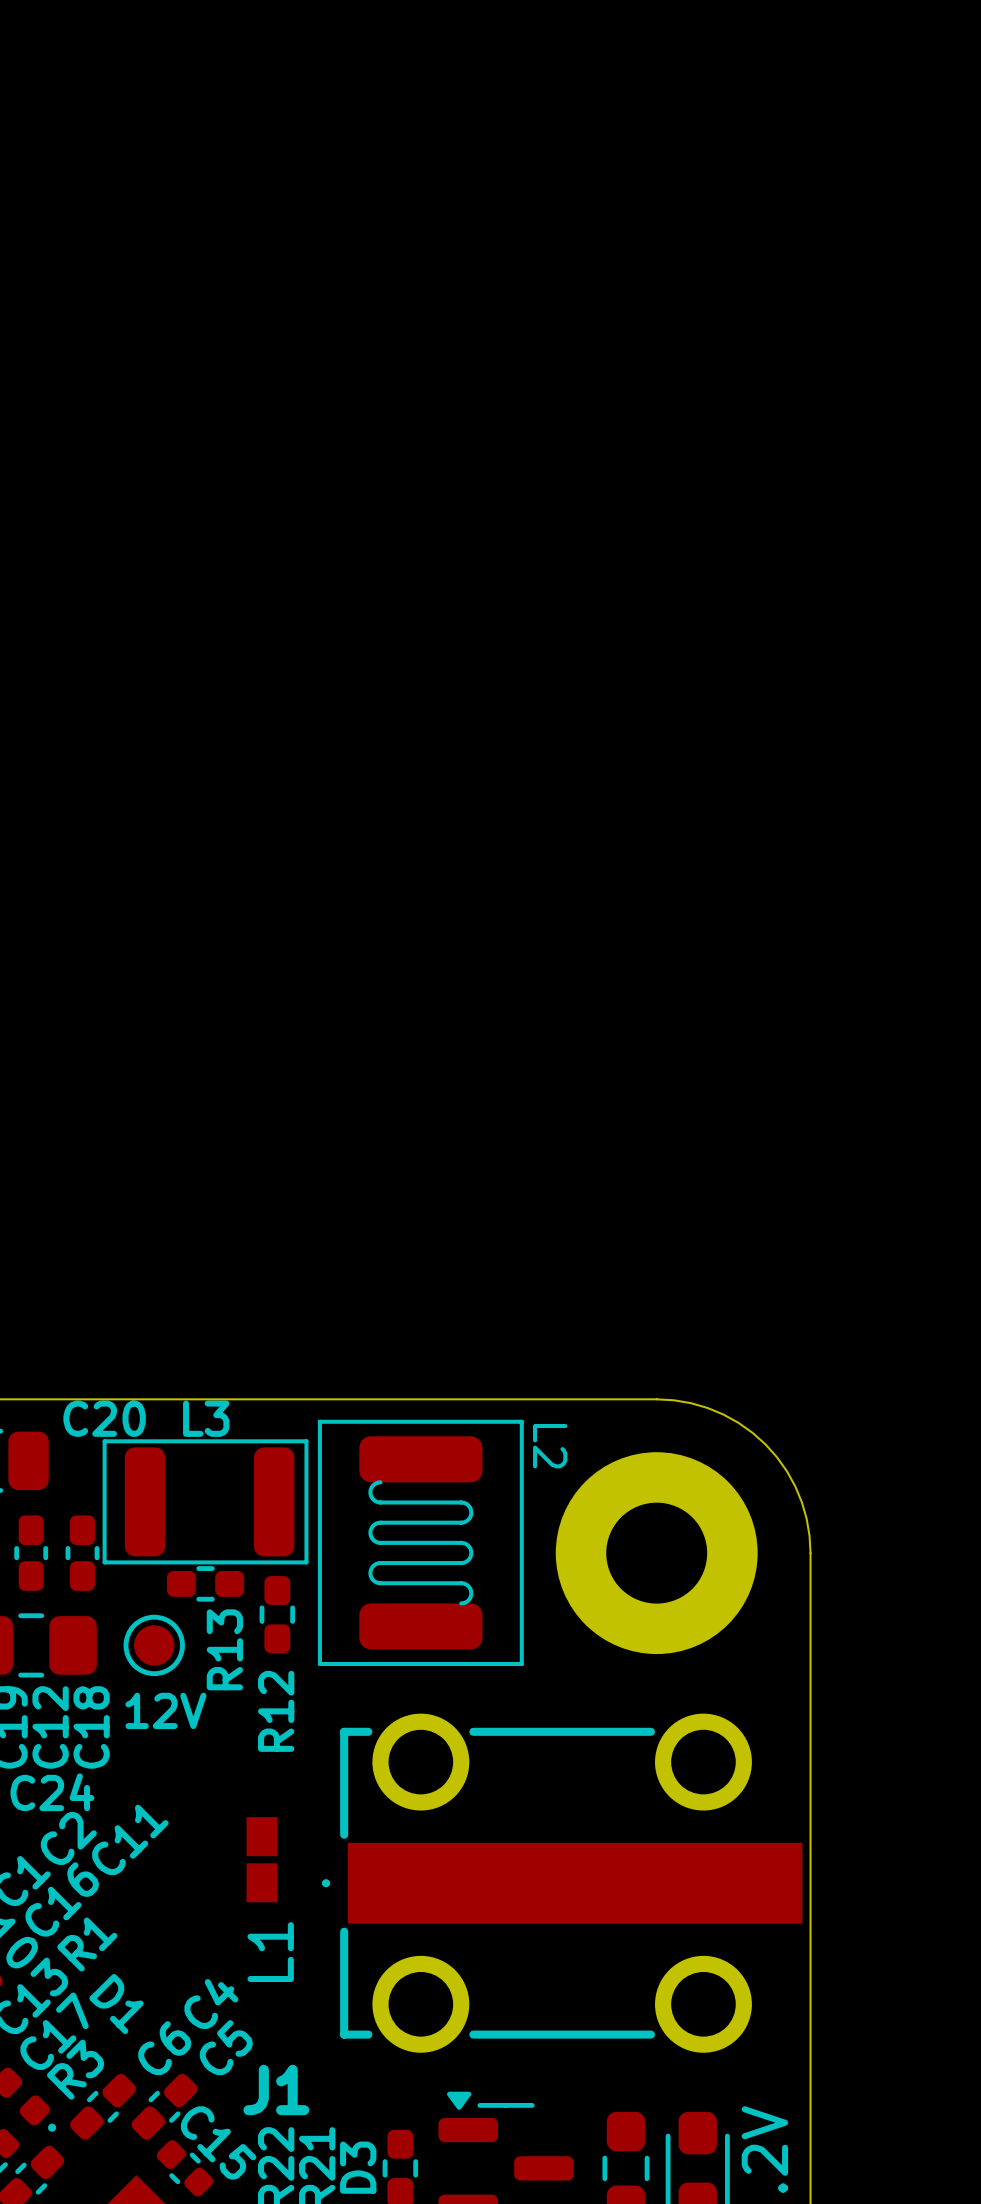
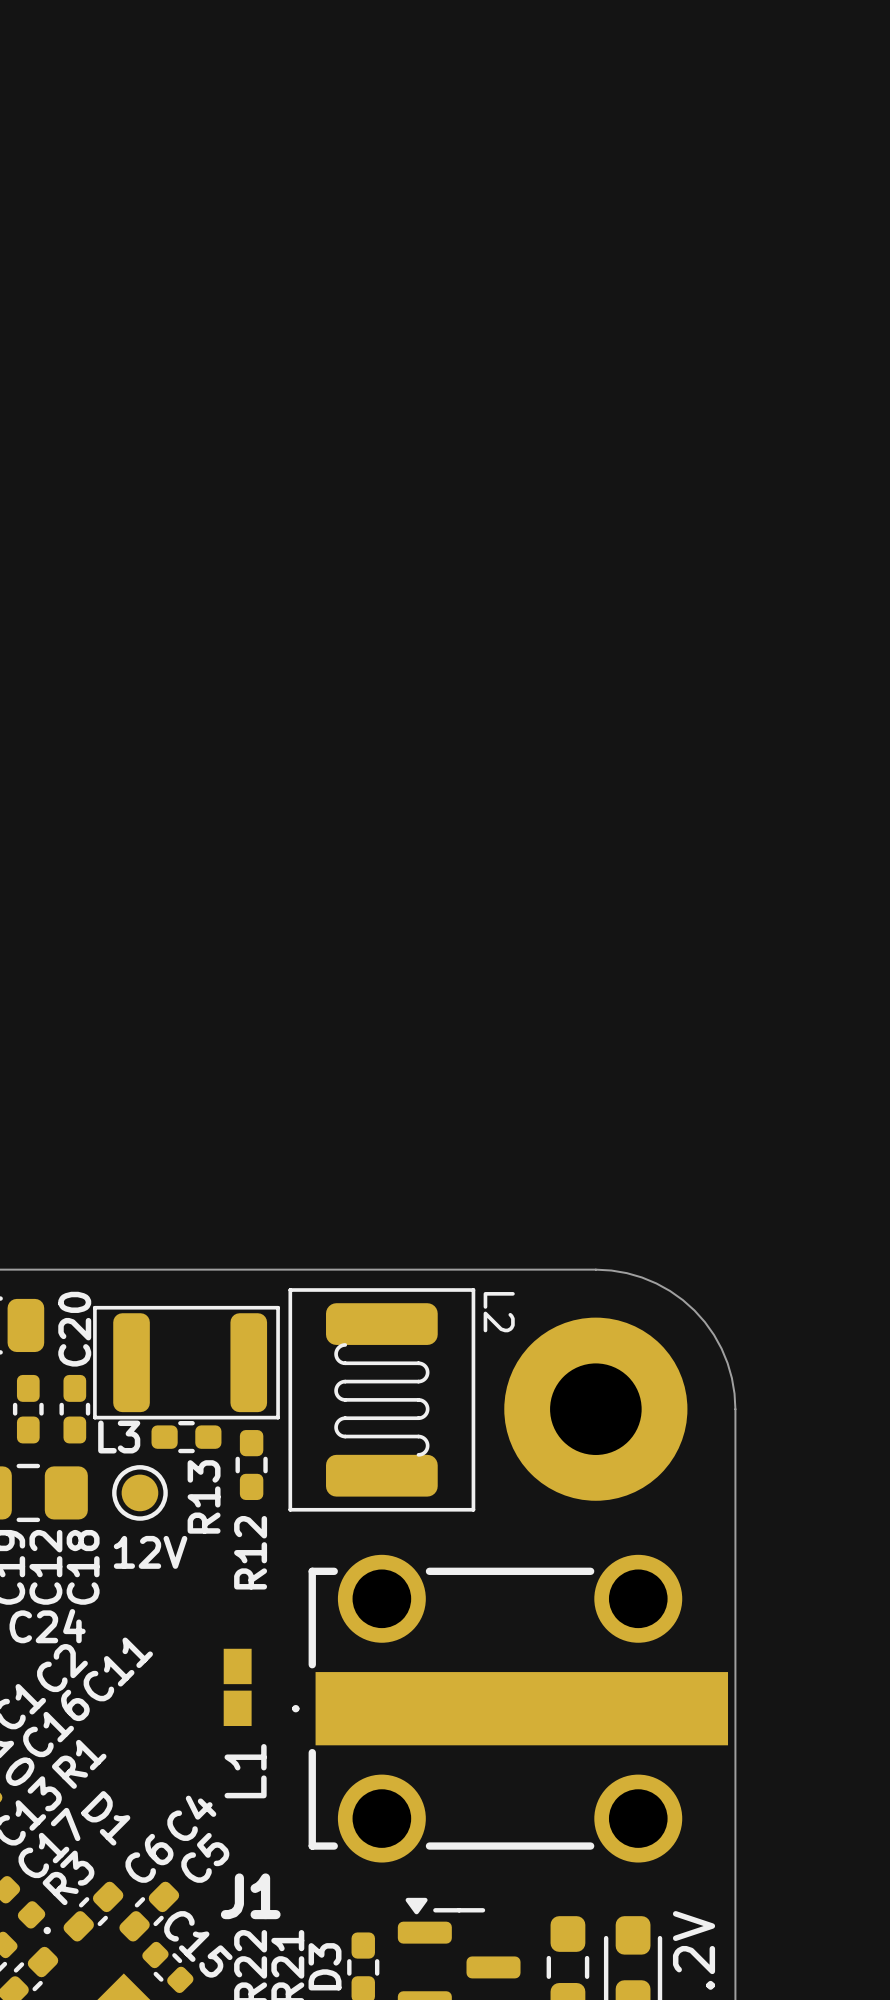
C20 name rotation: 0° (104, 1418) -> 90° counterclockwise (74, 1329)
L3 name position: L3 (206, 1418) -> L3 (119, 1437)

